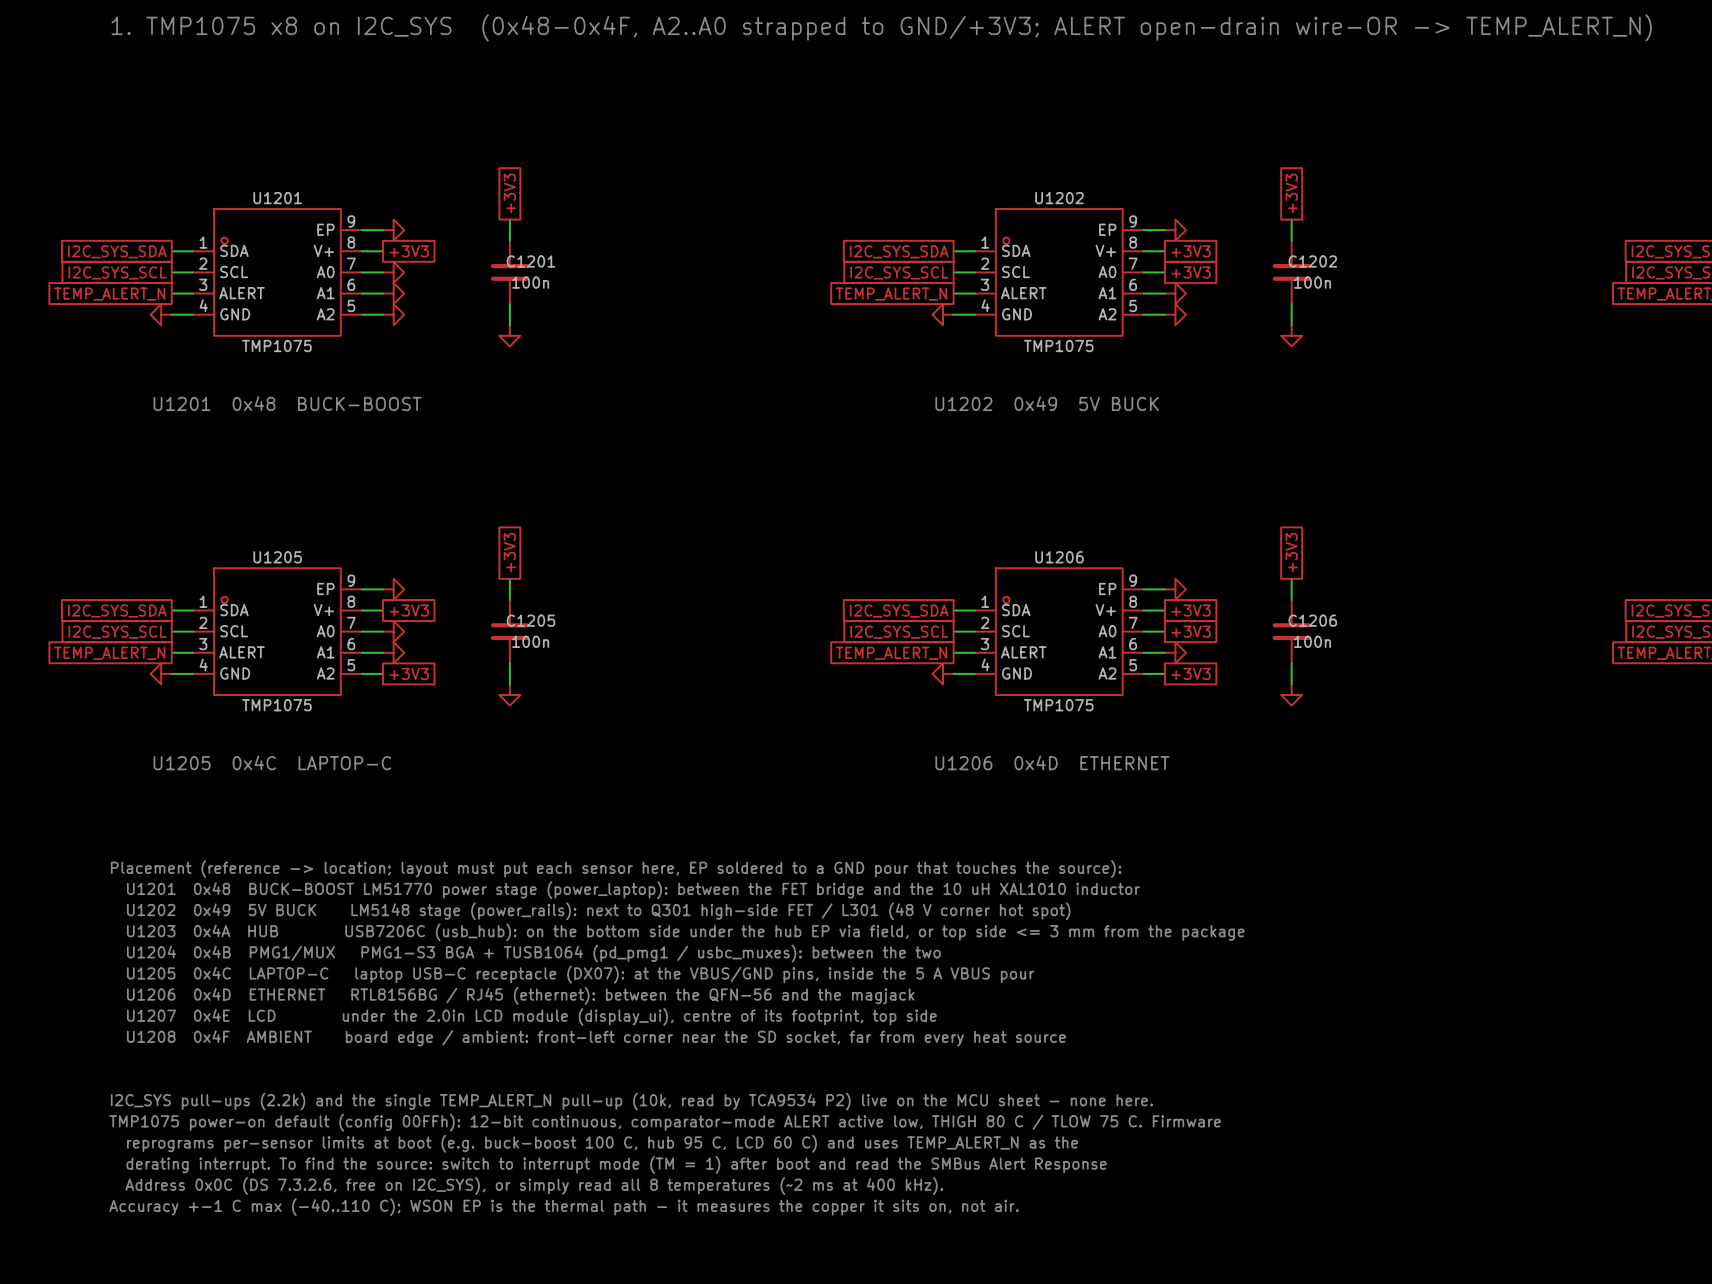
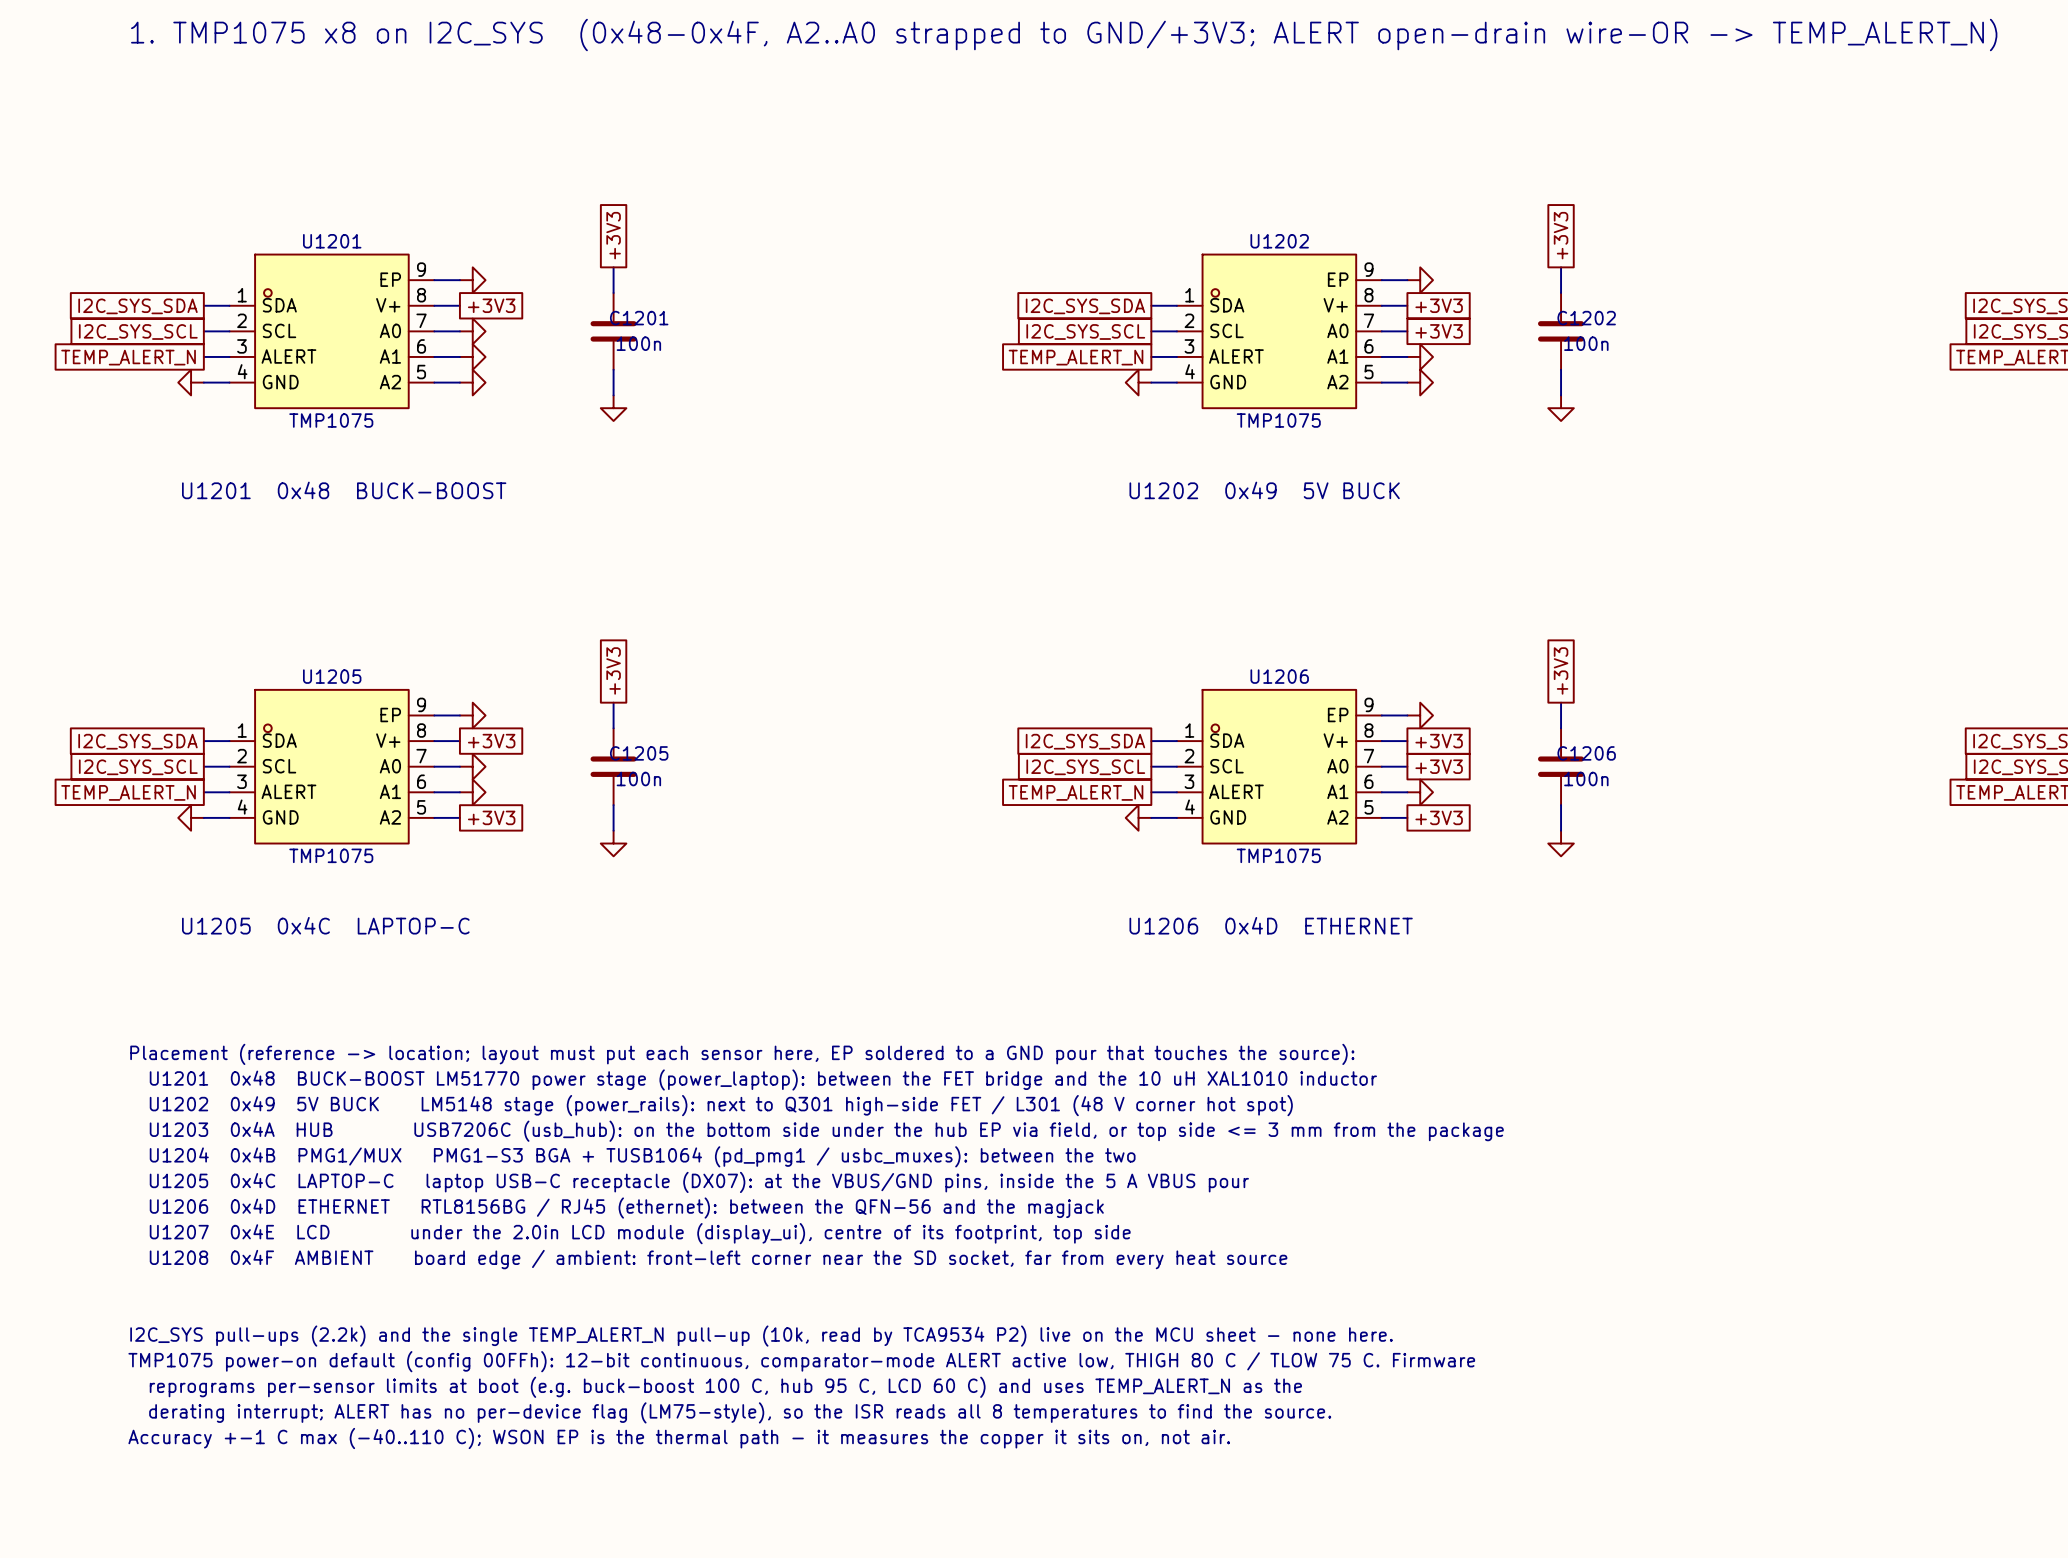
text: derating interrupt. To find the source: switch to interrupt mode (TM = 1) after boot and read the SMBus Alert Response (616, 1164) -> derating interrupt; ALERT has no per-device flag (LM75-style), so the ISR reads all 8 temperatures to find the source. (740, 1412)
text: Address 0x0C (DS 7.3.2.6, free on I2C_SYS), or simply read all 8 temperatures (~2 ms at 400 kHz). (534, 1185) -> Accuracy +-1 C max (-40..110 C); WSON EP is the thermal path - it measures the copper it sits on, not air. (679, 1438)
text: Accuracy +-1 C max (-40..110 C); WSON EP is the thermal path - it measures the copper it sits on, not air. (564, 1207) -> none

